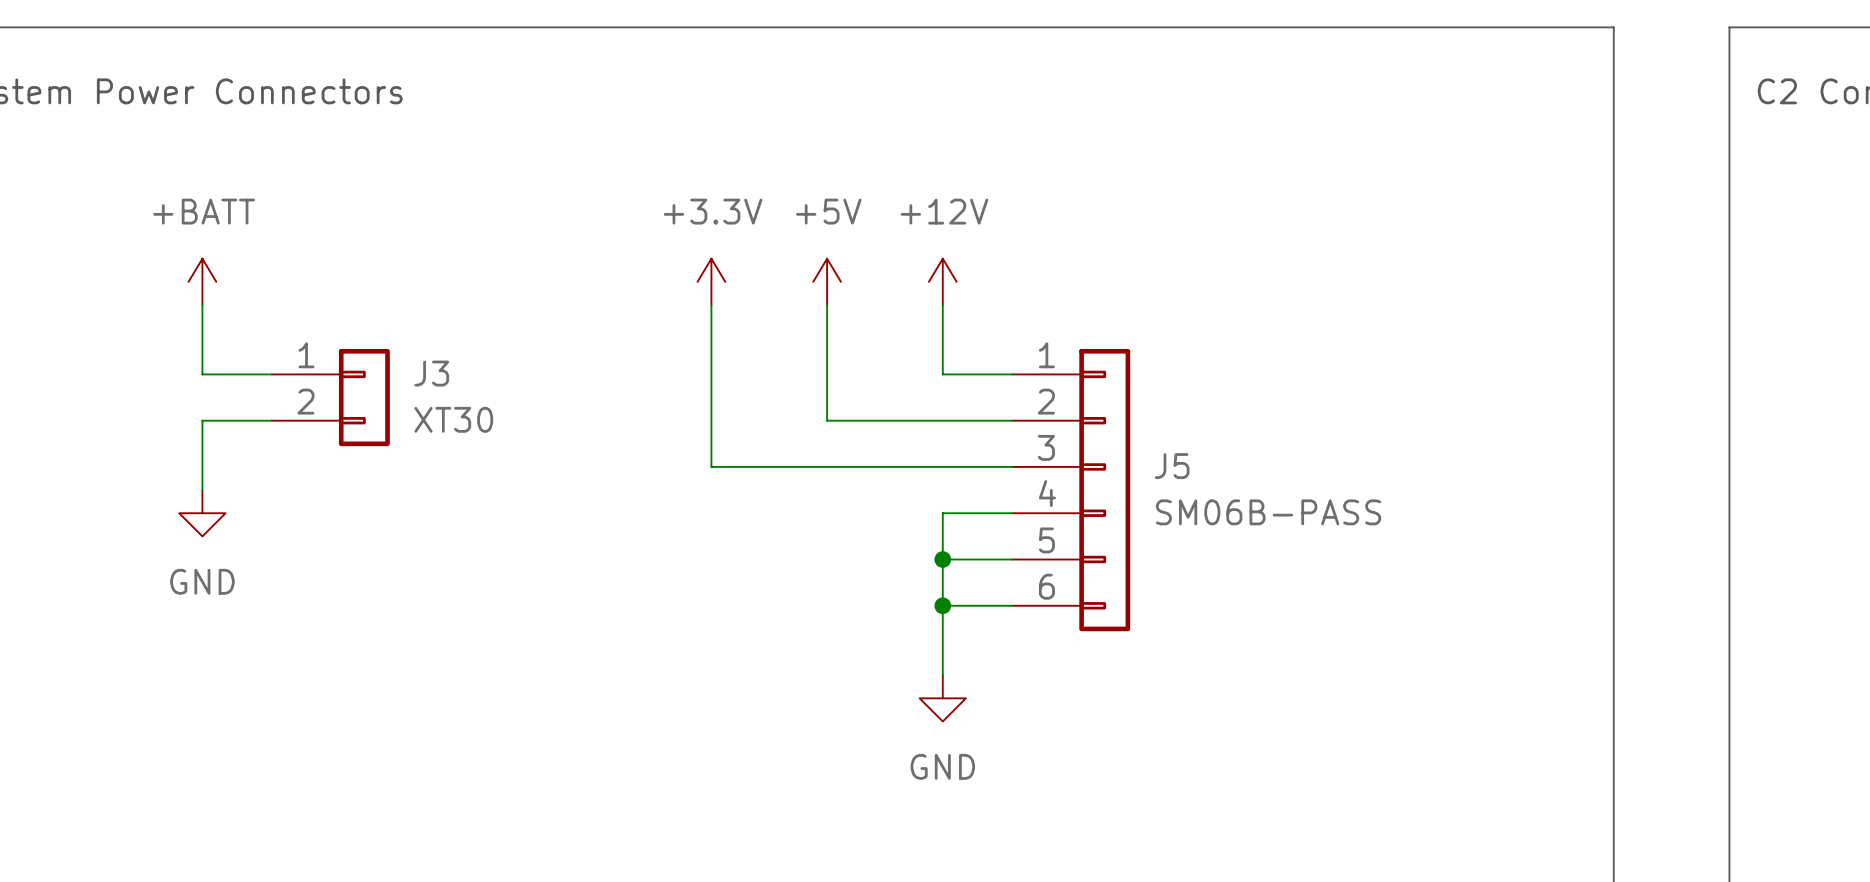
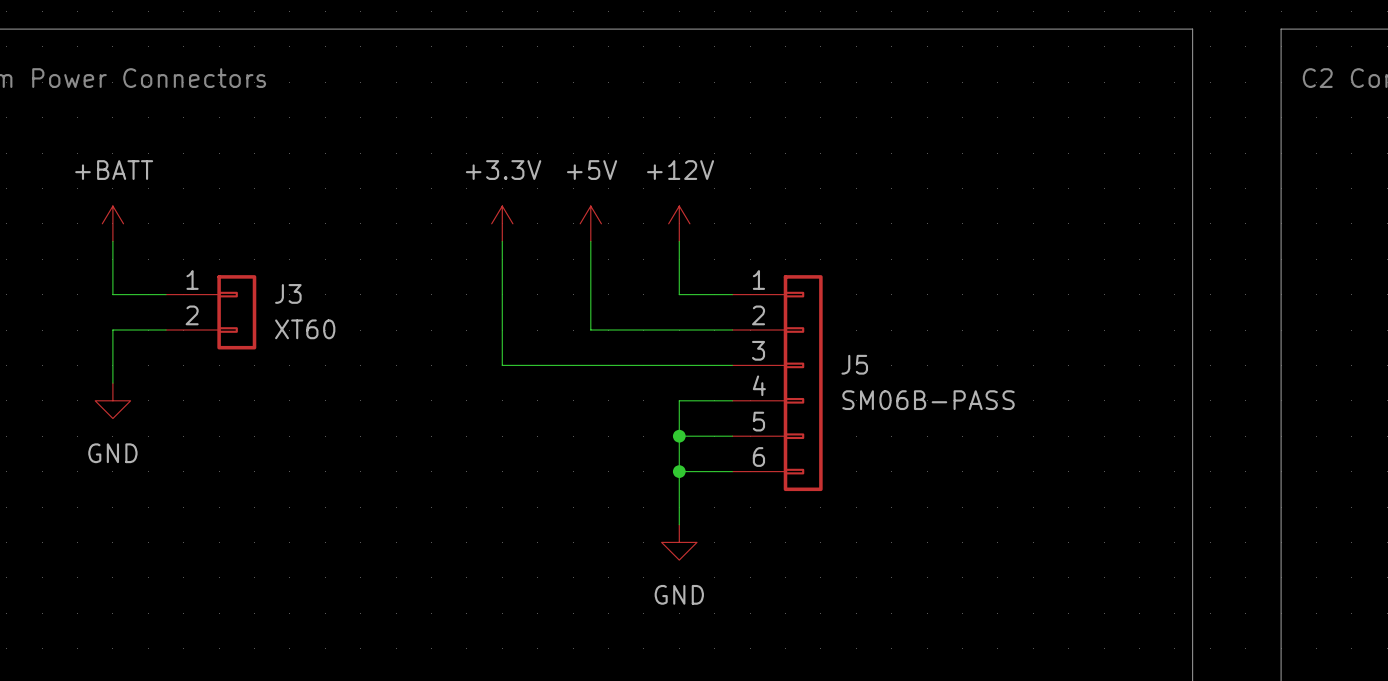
J3 value: XT30 (453, 419) -> XT60 (305, 329)

